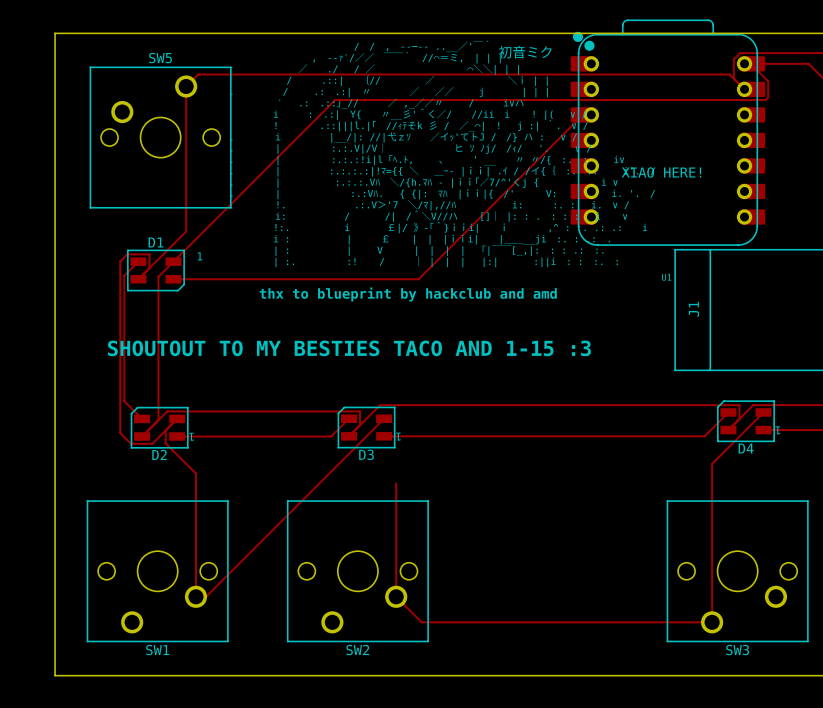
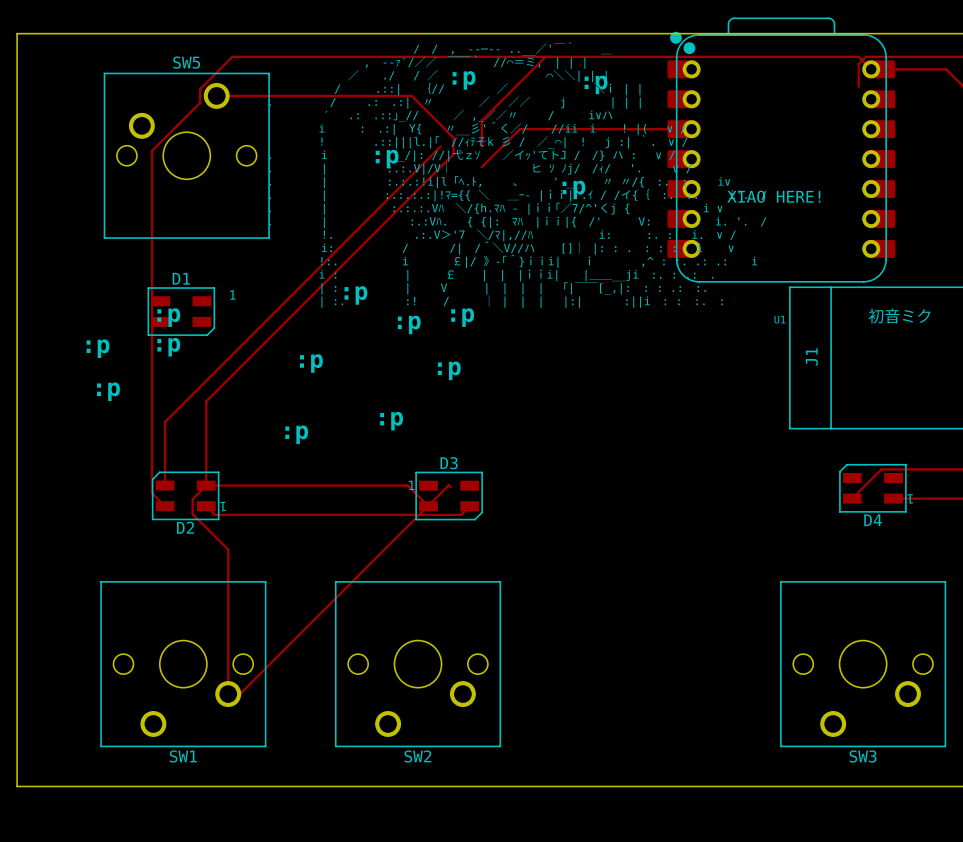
board edge: (55, 33) (55, 675) -> (63, 33) (17, 33) (17, 786) (63, 786)
text: 初音ミク (525, 52) -> none
track: none -> (545, 56) (481, 120) (481, 146)
track: (750, 63) (768, 81) (768, 97) (765, 100) (335, 100) (158, 276) (158, 420) -> none
text: none -> :p (464, 80)
text: none -> :p (596, 84)
track: none -> (216, 95) (411, 95) (453, 137) (453, 154) (206, 401) (206, 485) (407, 485) (428, 506)
track: (744, 89) (729, 74) (198, 74) (186, 86) (186, 231) (138, 279) -> none
track: (582, 114) (418, 279) (173, 279) -> none
track: none -> (691, 129) (519, 129) (481, 167)
text: none -> :p (387, 159)
text: none -> :p (573, 189)
text: none -> :p (355, 295)
track: (138, 261) (124, 275) (124, 401) (142, 418) -> (440, 146) (165, 422) (165, 485)
track: (149, 268) (149, 254) (127, 254) (120, 261) (120, 433) (131, 443) (152, 443) (166, 430) -> none
text: none -> 初音ミク (899, 316)
text: none -> :p (168, 317)
text: none -> :p (462, 317)
text: none -> :p (409, 324)
text: thx to blueprint by hackclub and amd (408, 294) -> none
text: none -> :p (168, 347)
text: none -> :p (98, 348)
text: none -> :p (311, 363)
text: none -> :p (449, 370)
text: none -> :p (108, 391)
text: SHOUTOUT TO MY BESTIES TACO AND 1-15 :3 (349, 348) -> none
text: none -> :p (391, 421)
text: none -> :p (296, 434)
track: (728, 412) (704, 436) (384, 436) -> none
track: (763, 412) (712, 463) (712, 622) (421, 622) (396, 596) (396, 483) -> none
track: (348, 418) (331, 436) (177, 436) -> (469, 506) (461, 514) (214, 514) (206, 506)
track: (739, 418) (739, 405) (380, 405) (348, 436) -> none
track: (360, 425) (360, 411) (167, 411) (142, 436) -> (871, 69) (858, 56) (232, 56) (200, 89) (200, 102) (152, 150) (152, 493) (165, 506)
D3 rotation: 0° (366, 427) -> 180° (449, 496)

